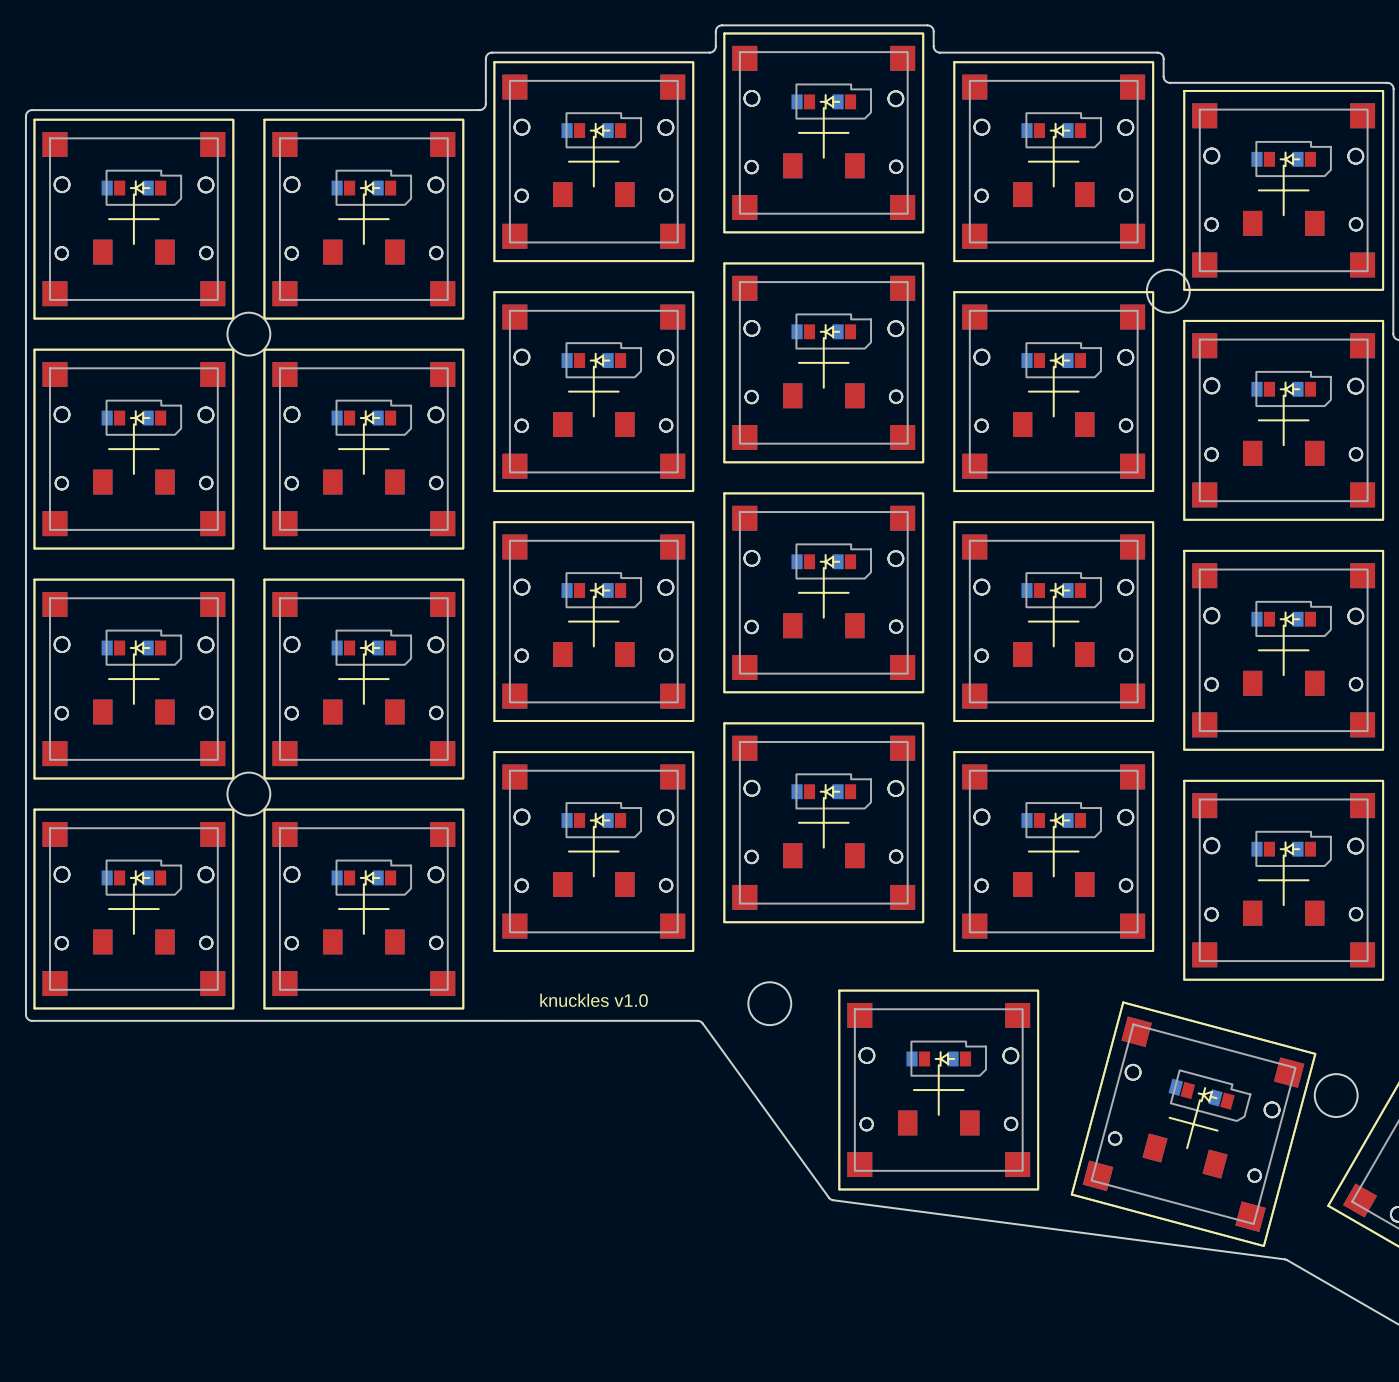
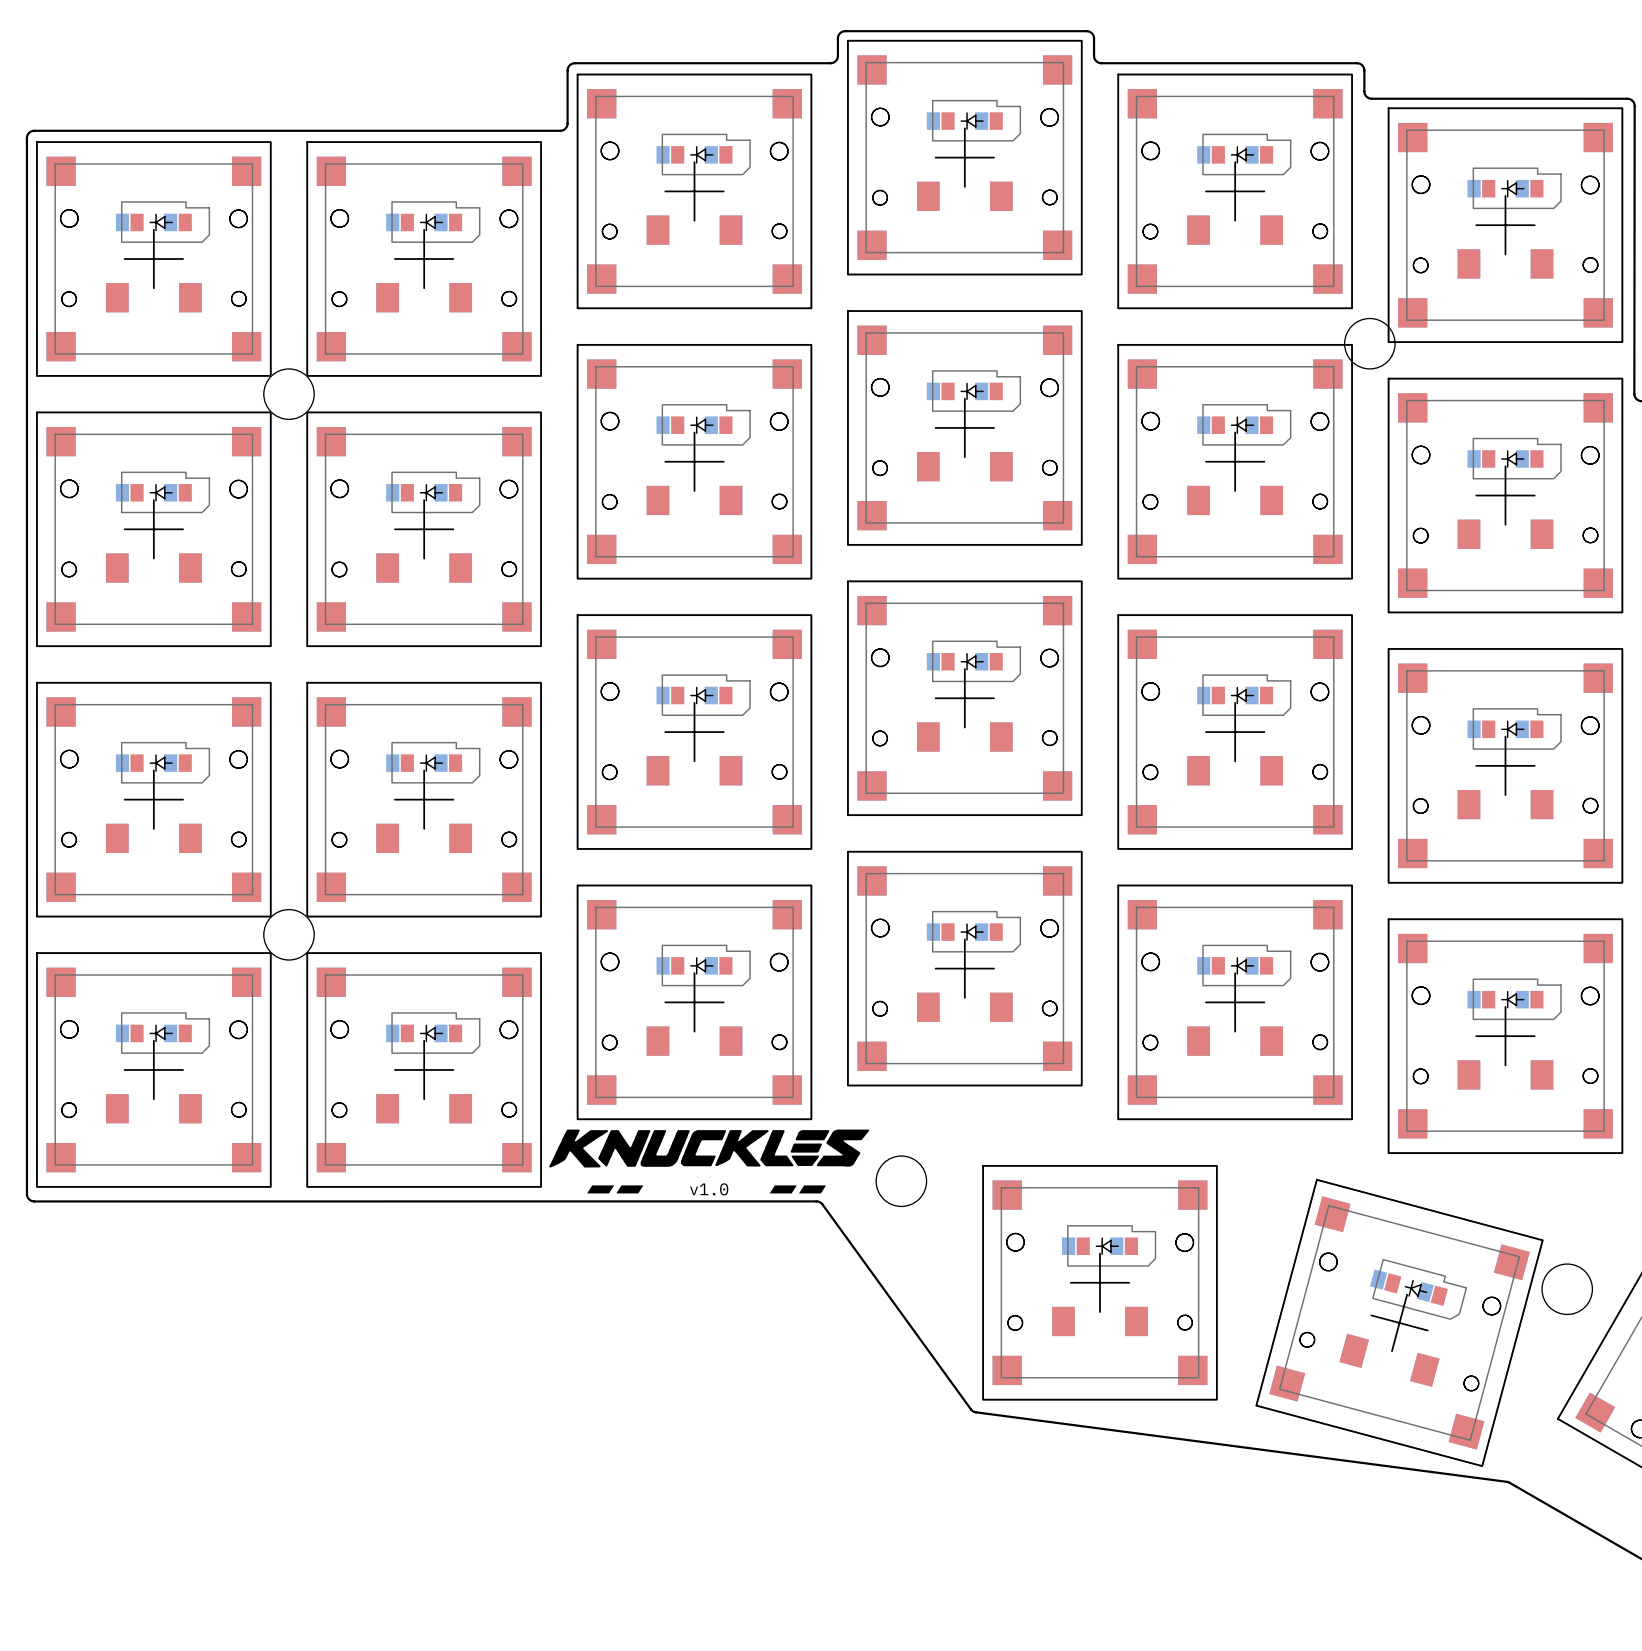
drawing: none -> [549, 1129, 870, 1194]
text: knuckles v1.0 (594, 1000) -> none
text: none -> v1.0 (709, 1189)

